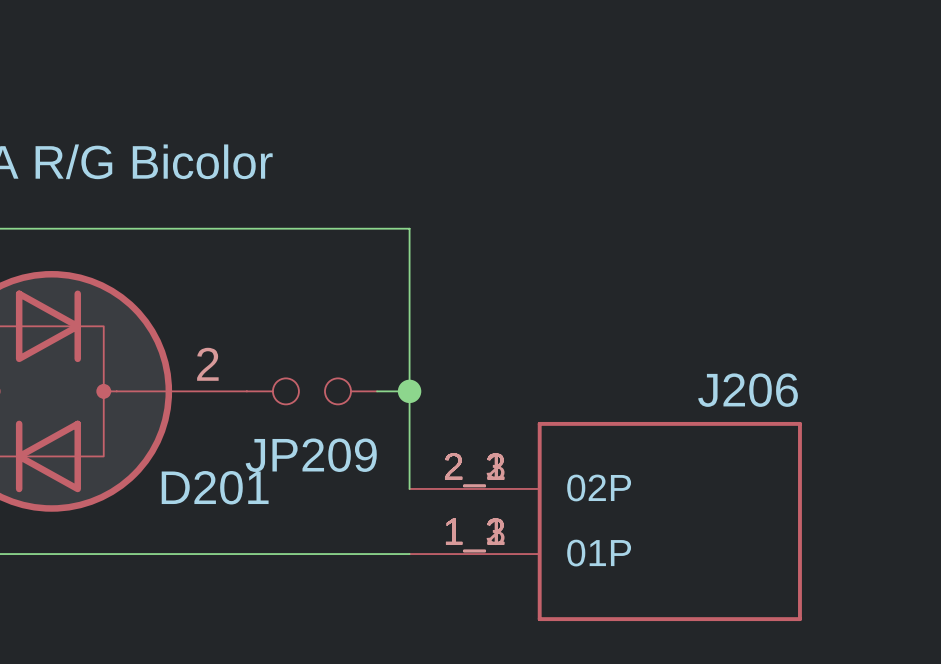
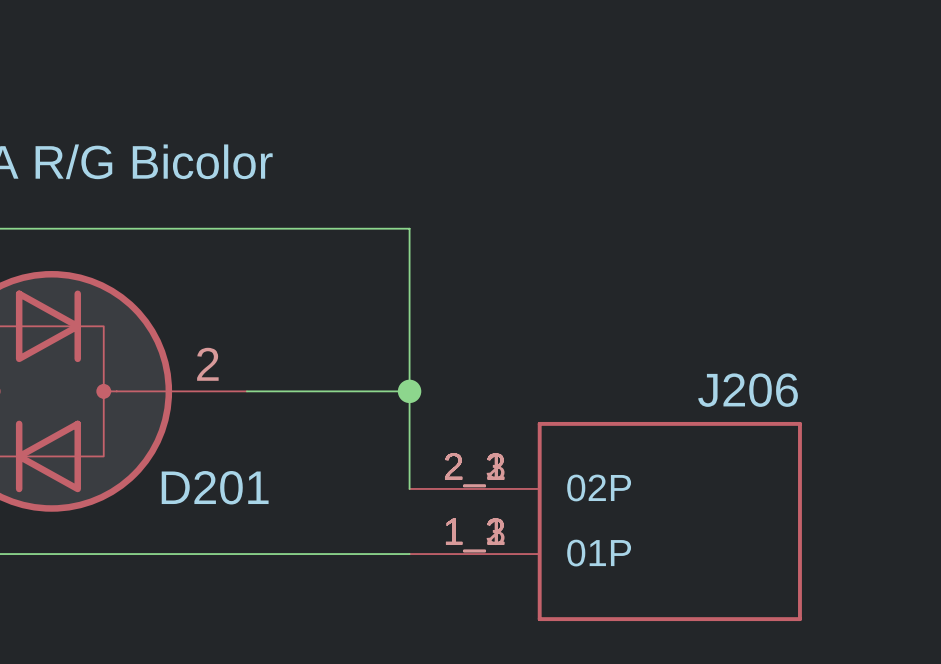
wire: none -> (246, 391) (377, 391)
JP209: (311, 391) -> none

